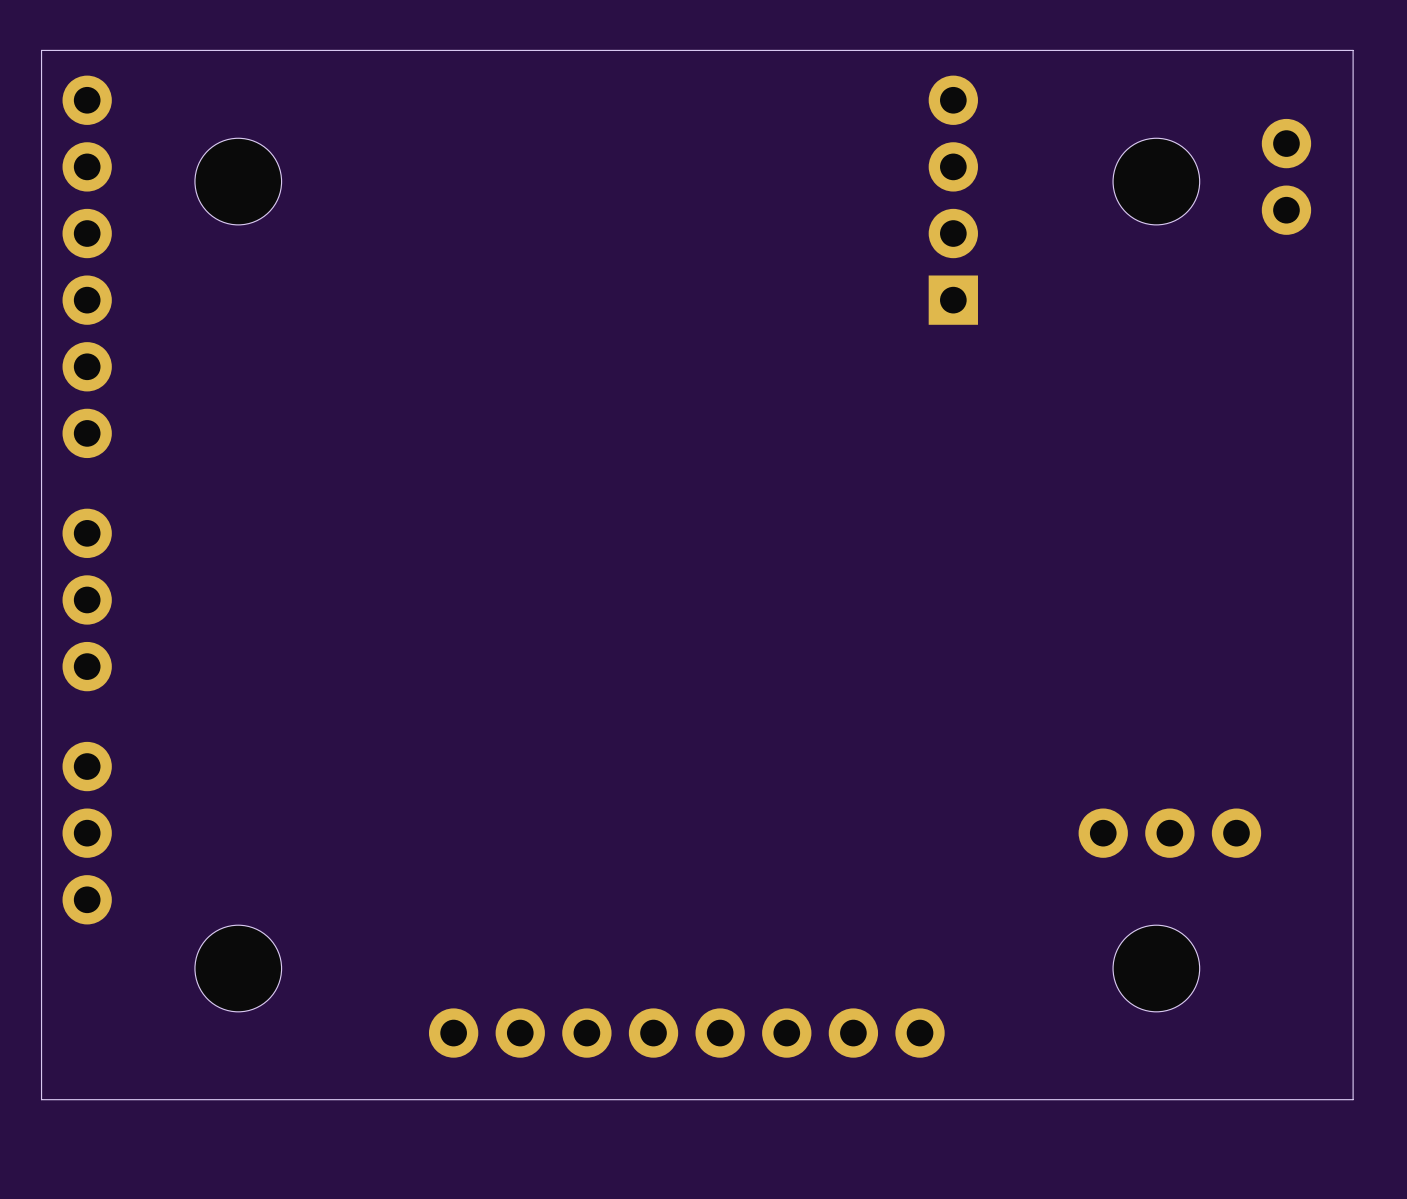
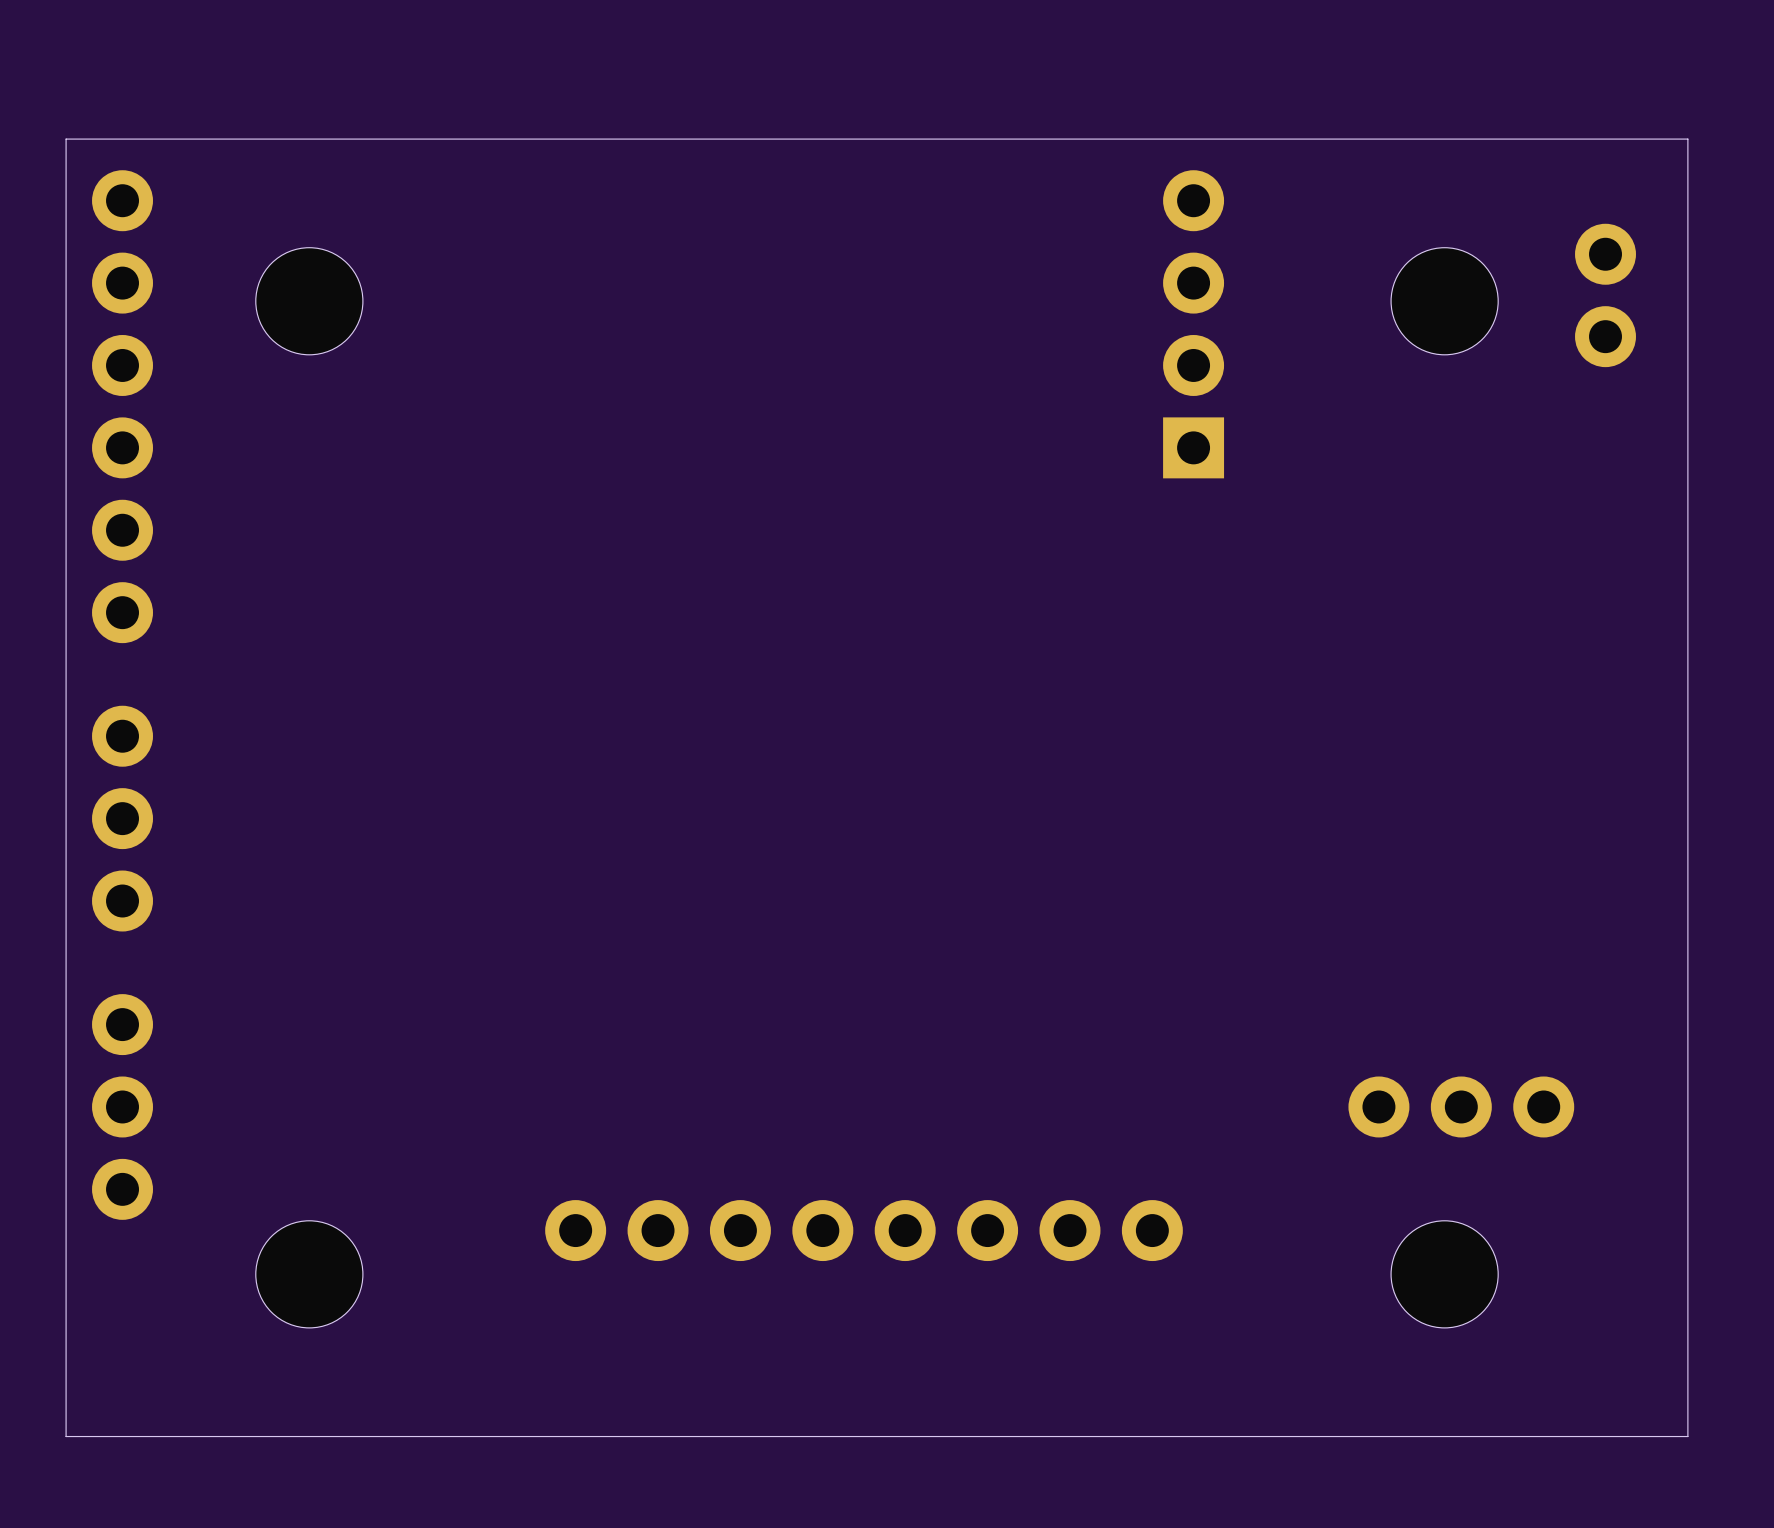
part position: (686, 1033) -> (864, 1230)

